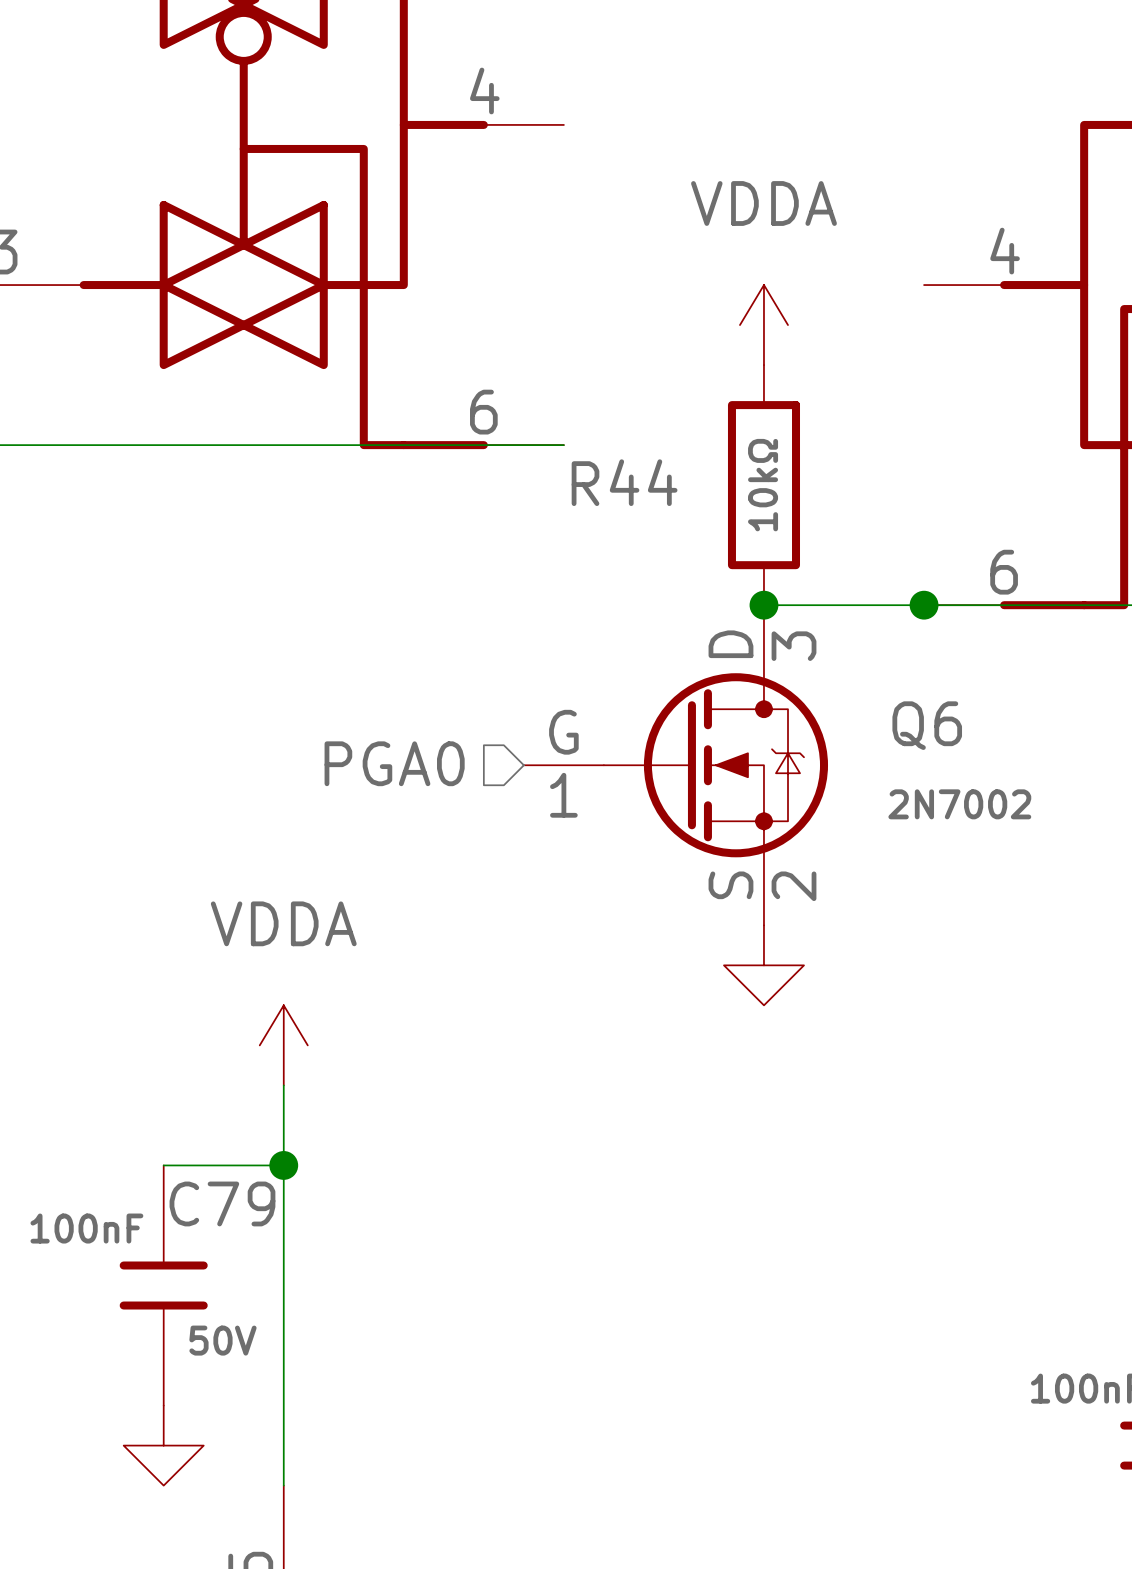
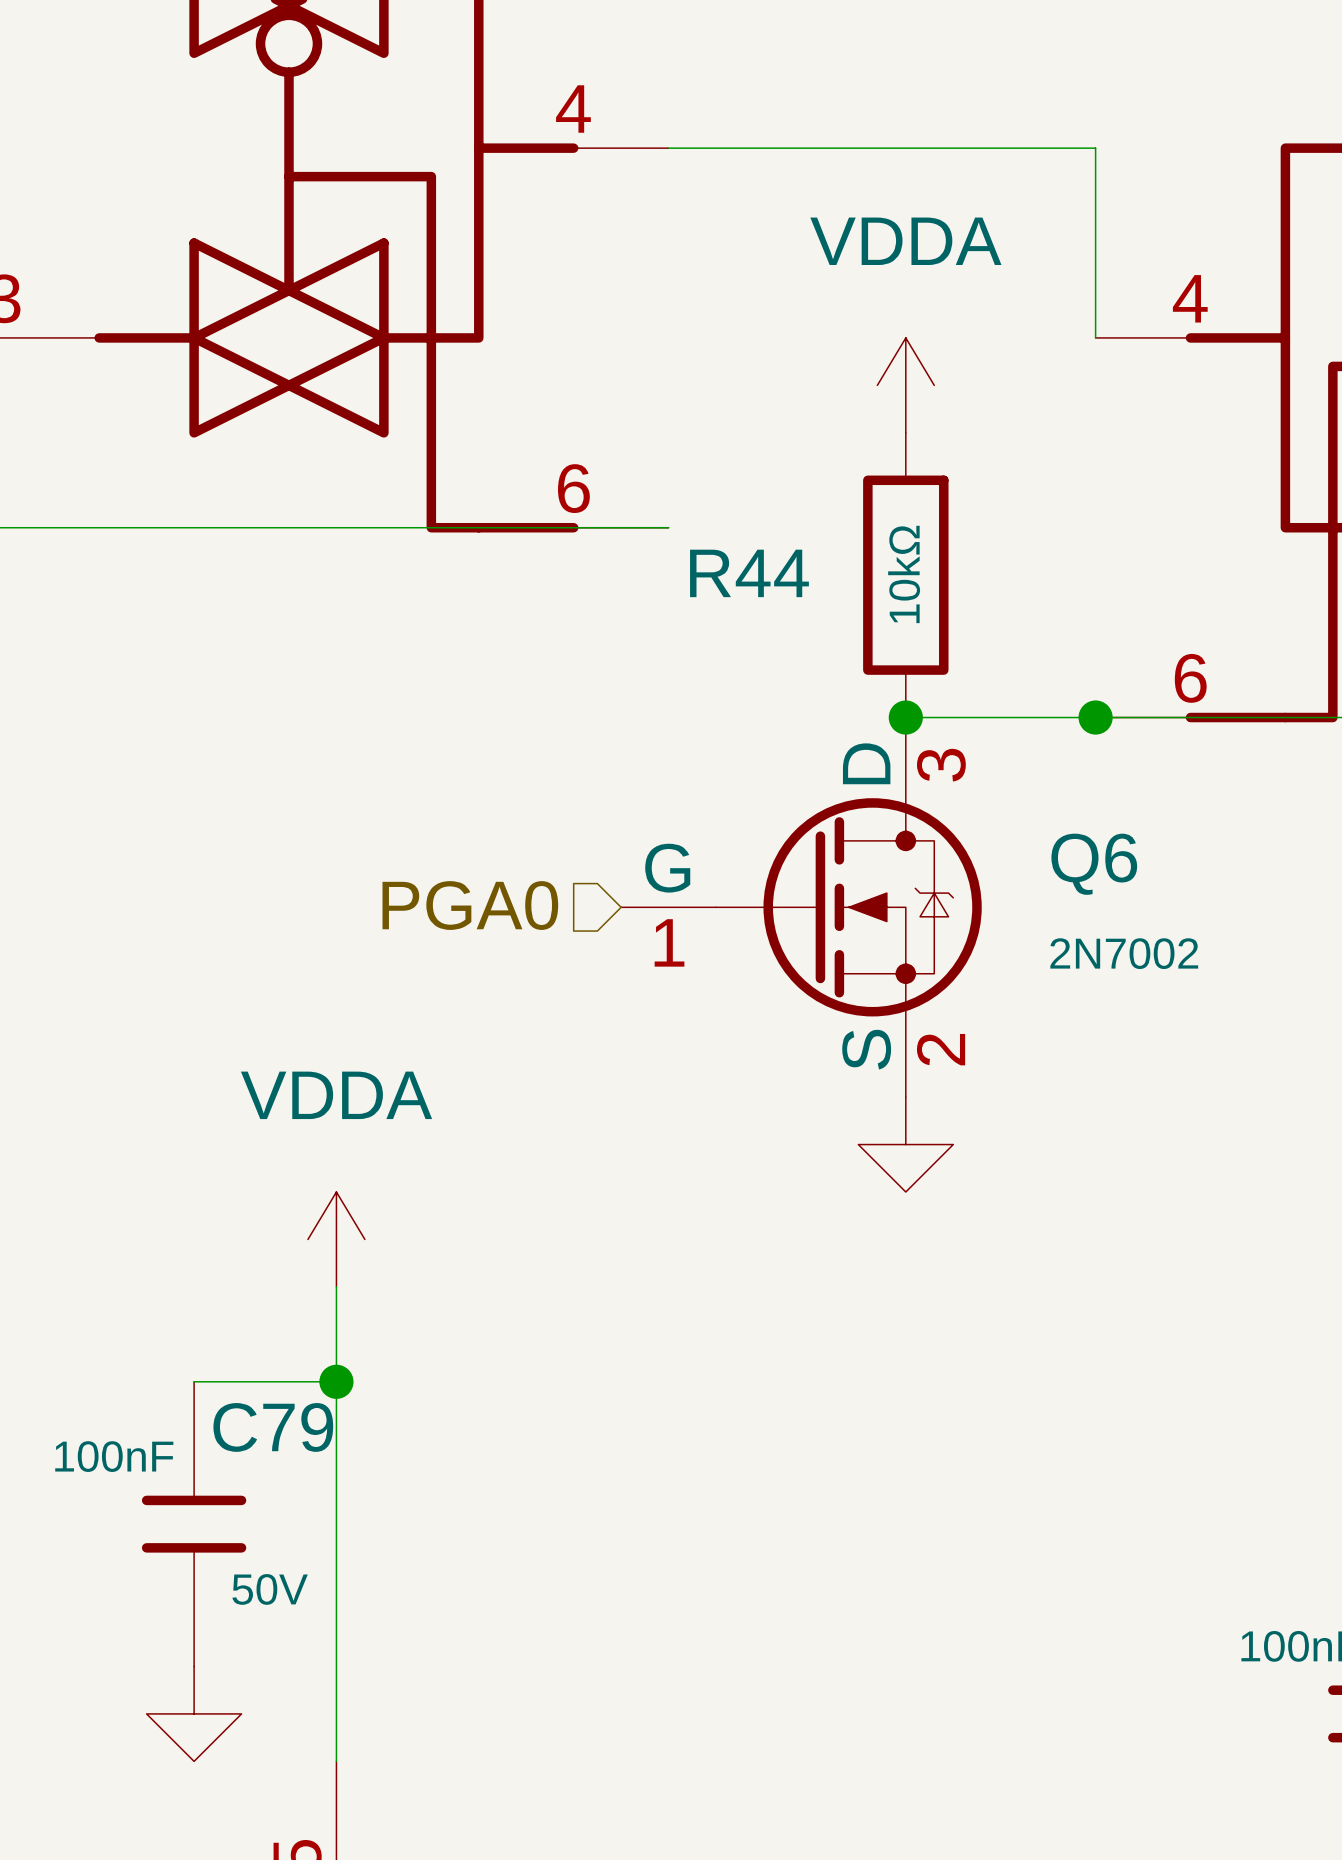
wire: none -> (668, 148) (1095, 148) (1095, 337)

